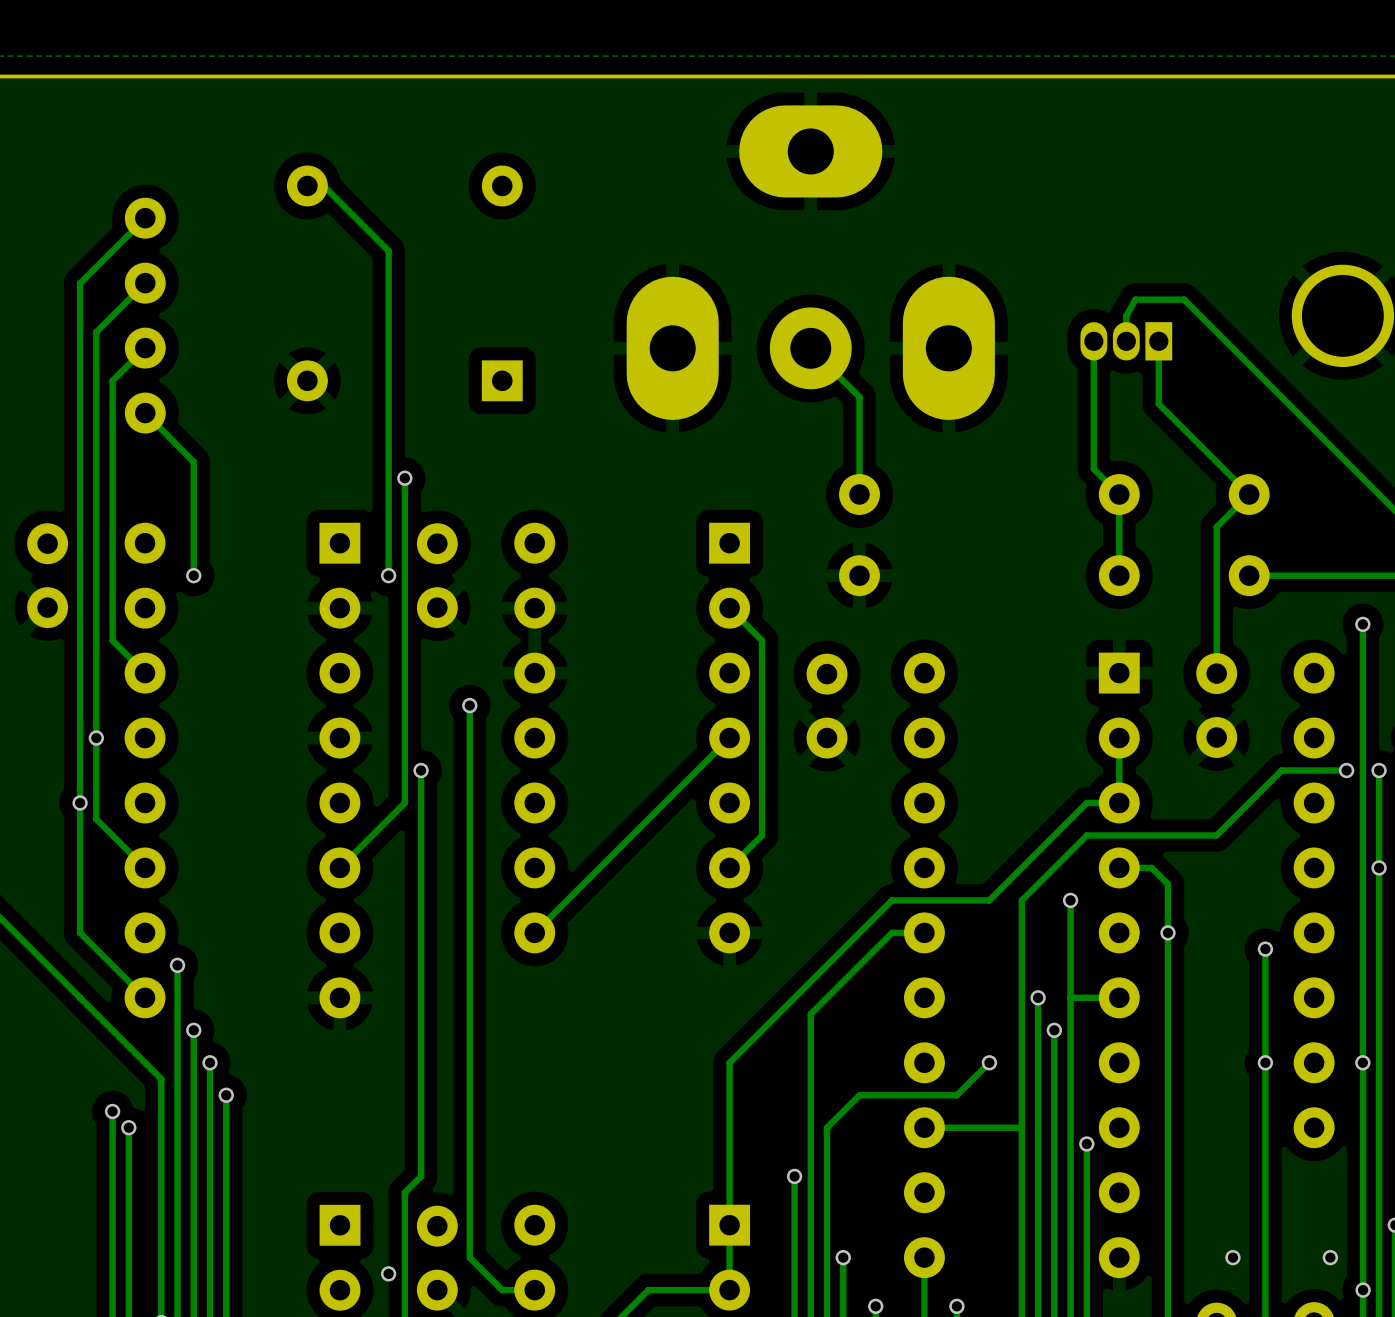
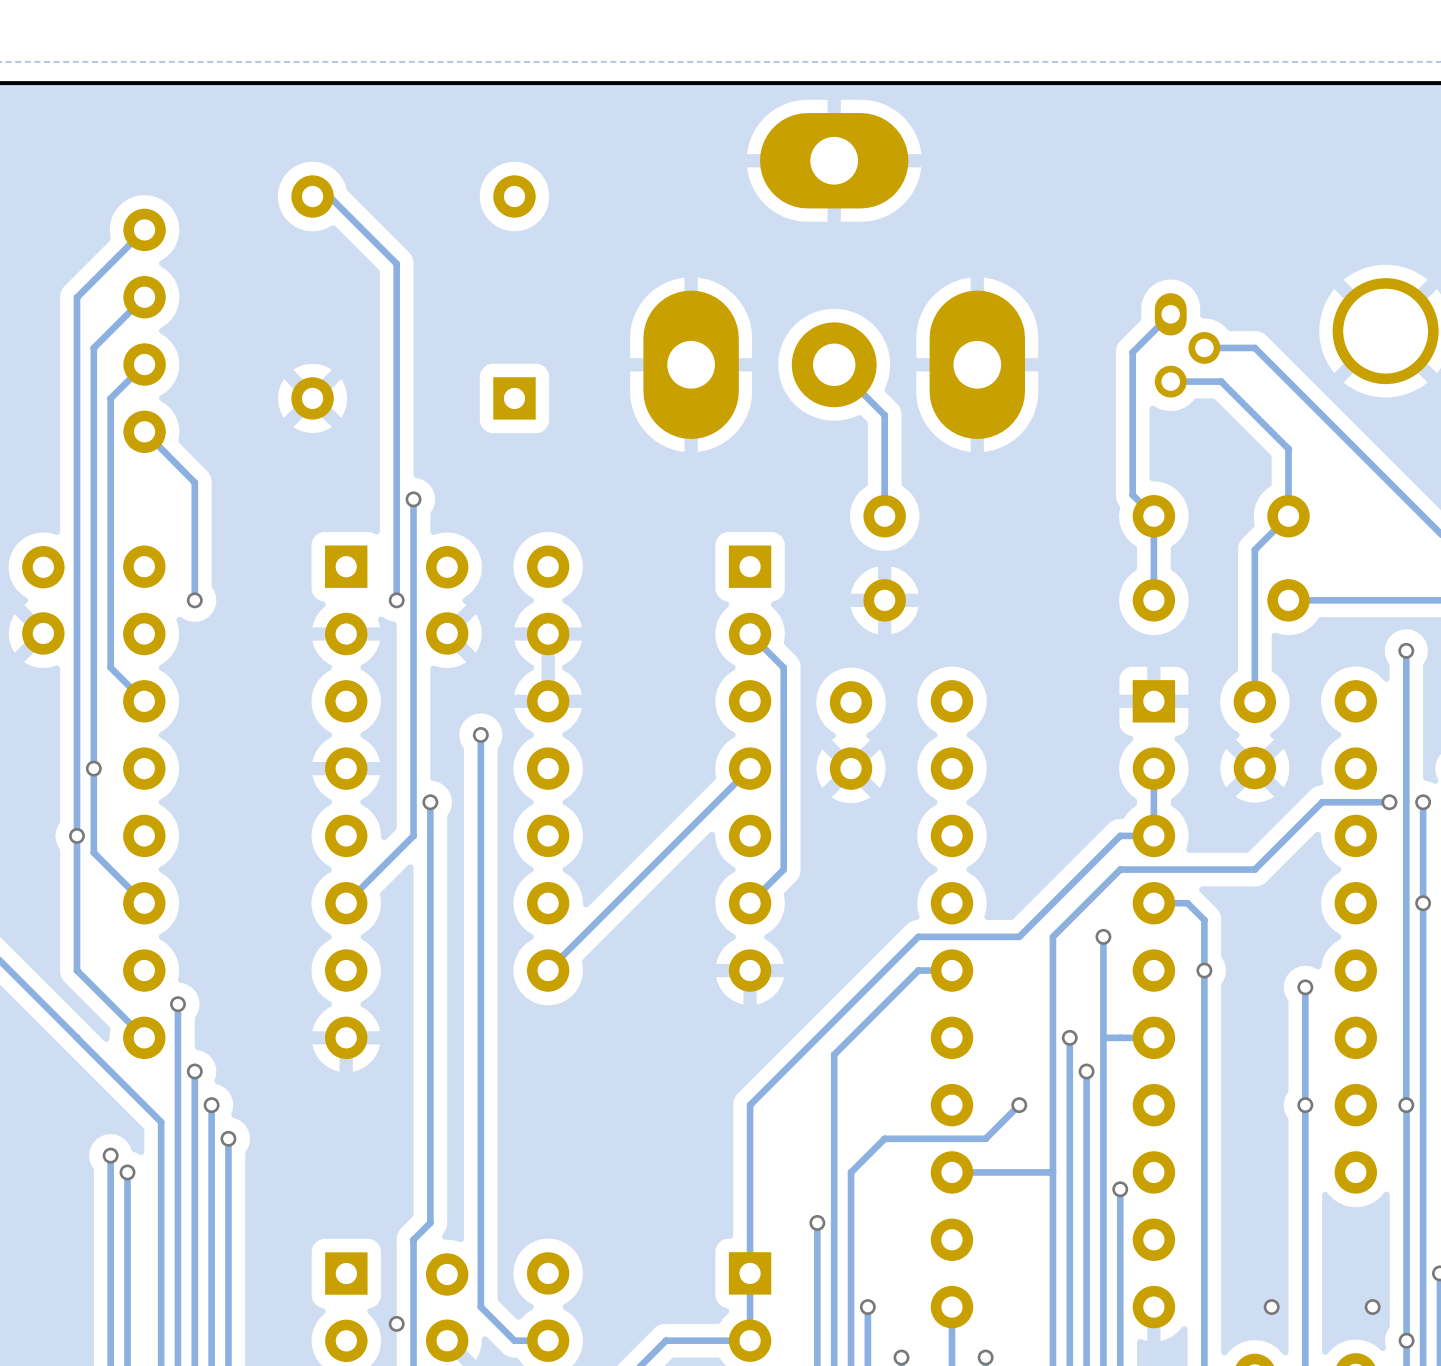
part: none -> (1187, 345)
track: (1216, 332) (1184, 299) (1135, 299) (1126, 315) (1126, 341) -> (1254, 347) (1204, 347)
track: (1093, 341) (1093, 469) (1098, 474) -> (1170, 314) (1132, 352) (1132, 495)
part: (1126, 341) -> none
track: (1158, 341) (1158, 404) (1249, 494) -> (1170, 381) (1221, 381) (1288, 448) (1288, 516)

